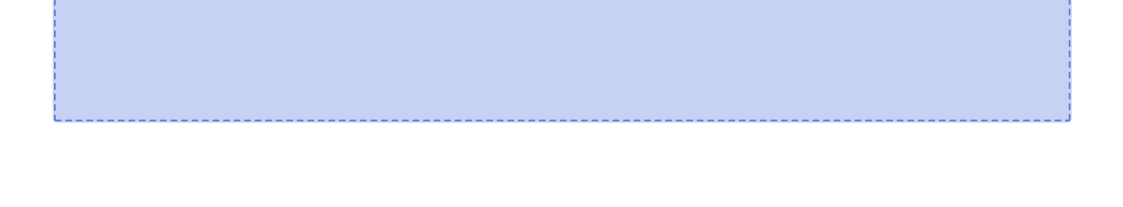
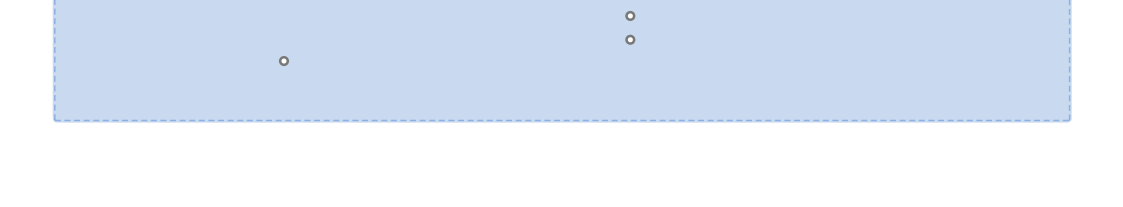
via: none -> (630, 15)
via: none -> (630, 39)
via: none -> (283, 61)

